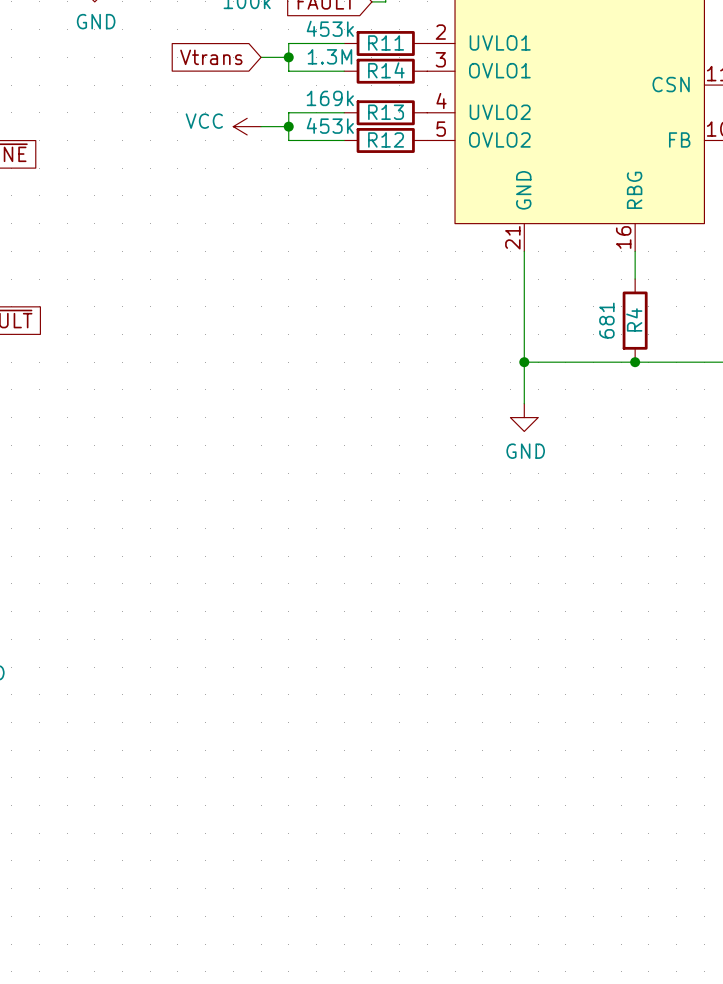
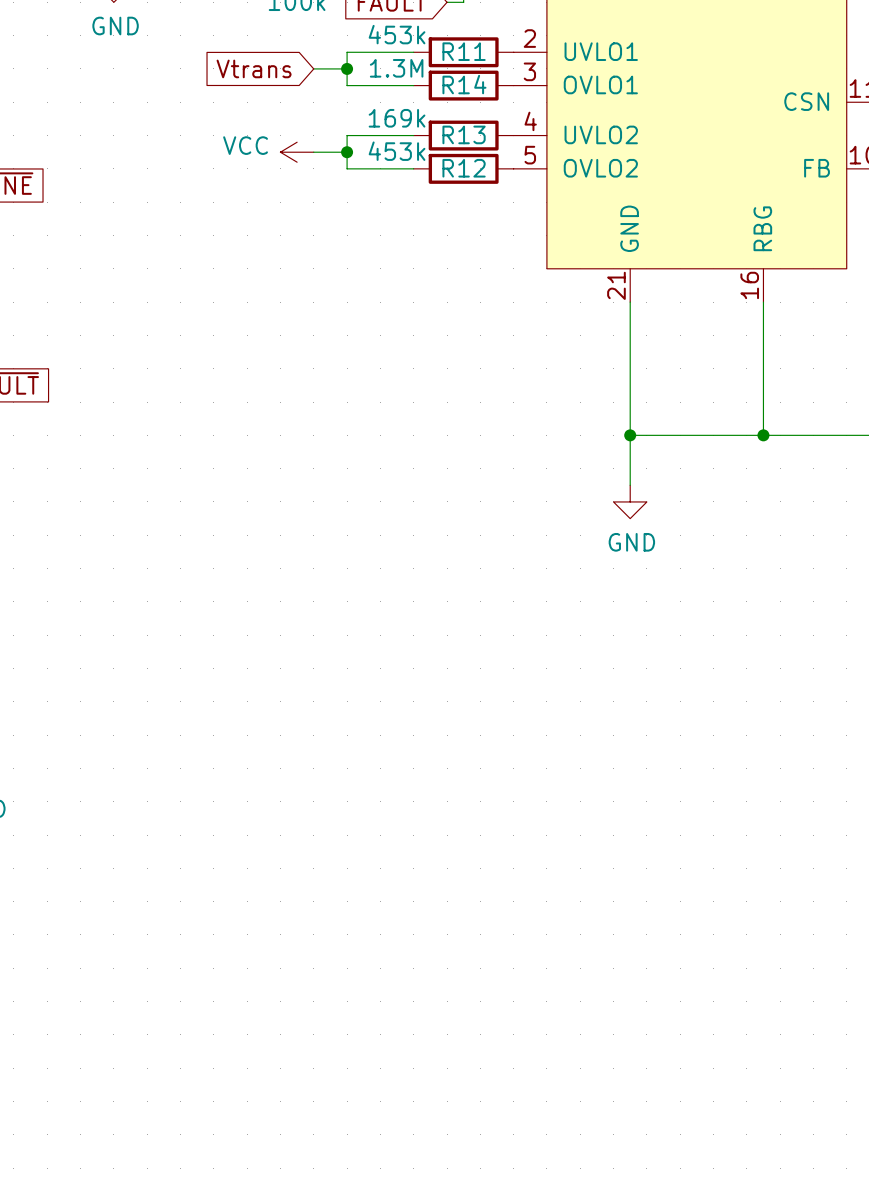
wire: none -> (763, 335) (763, 435)
R4: 681 (635, 320) -> none

